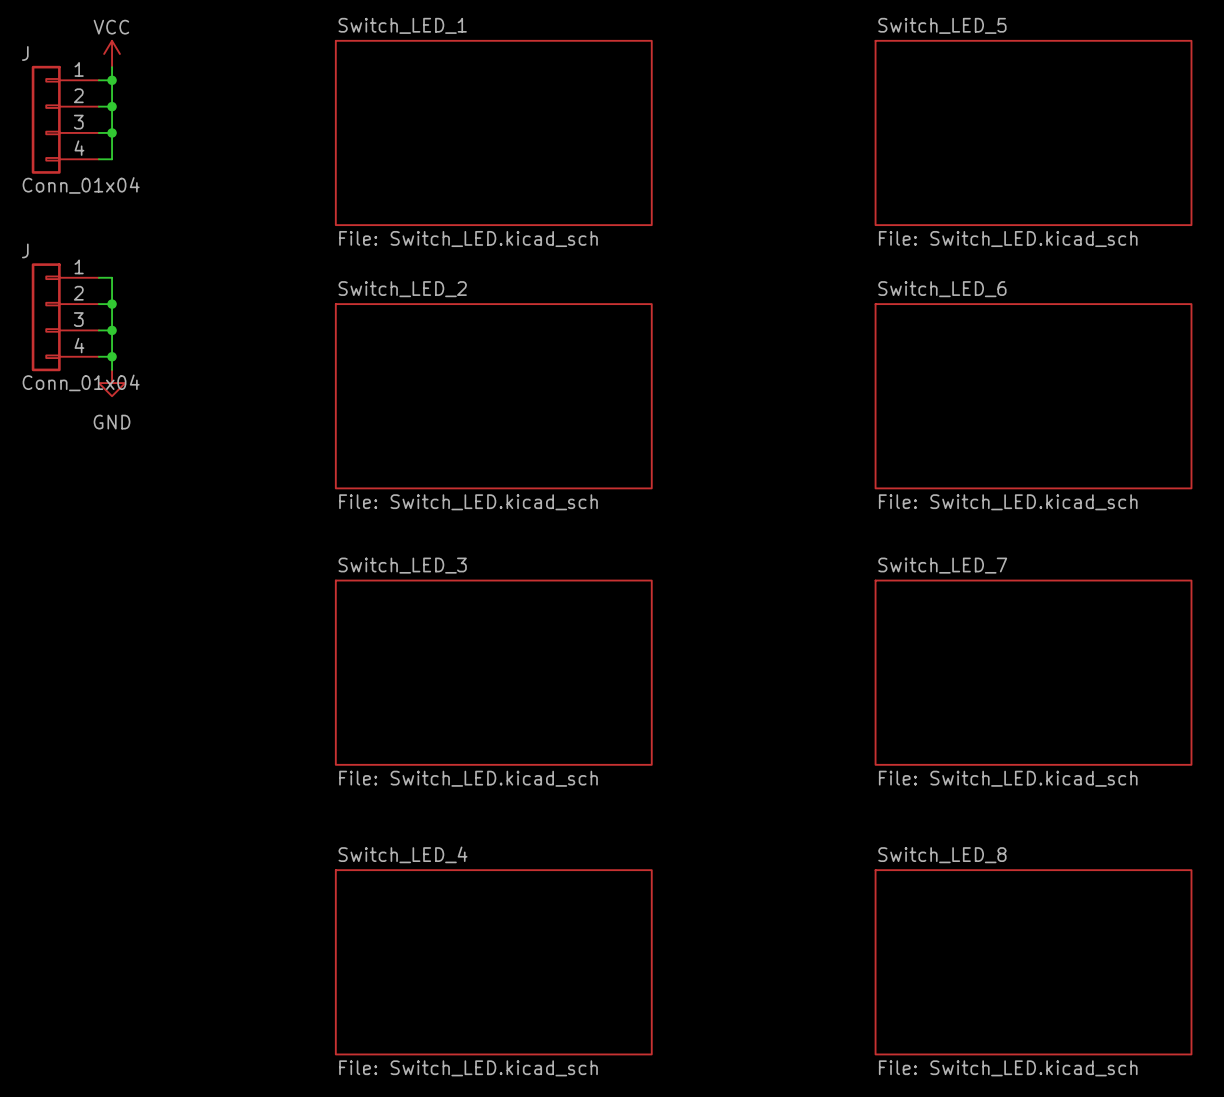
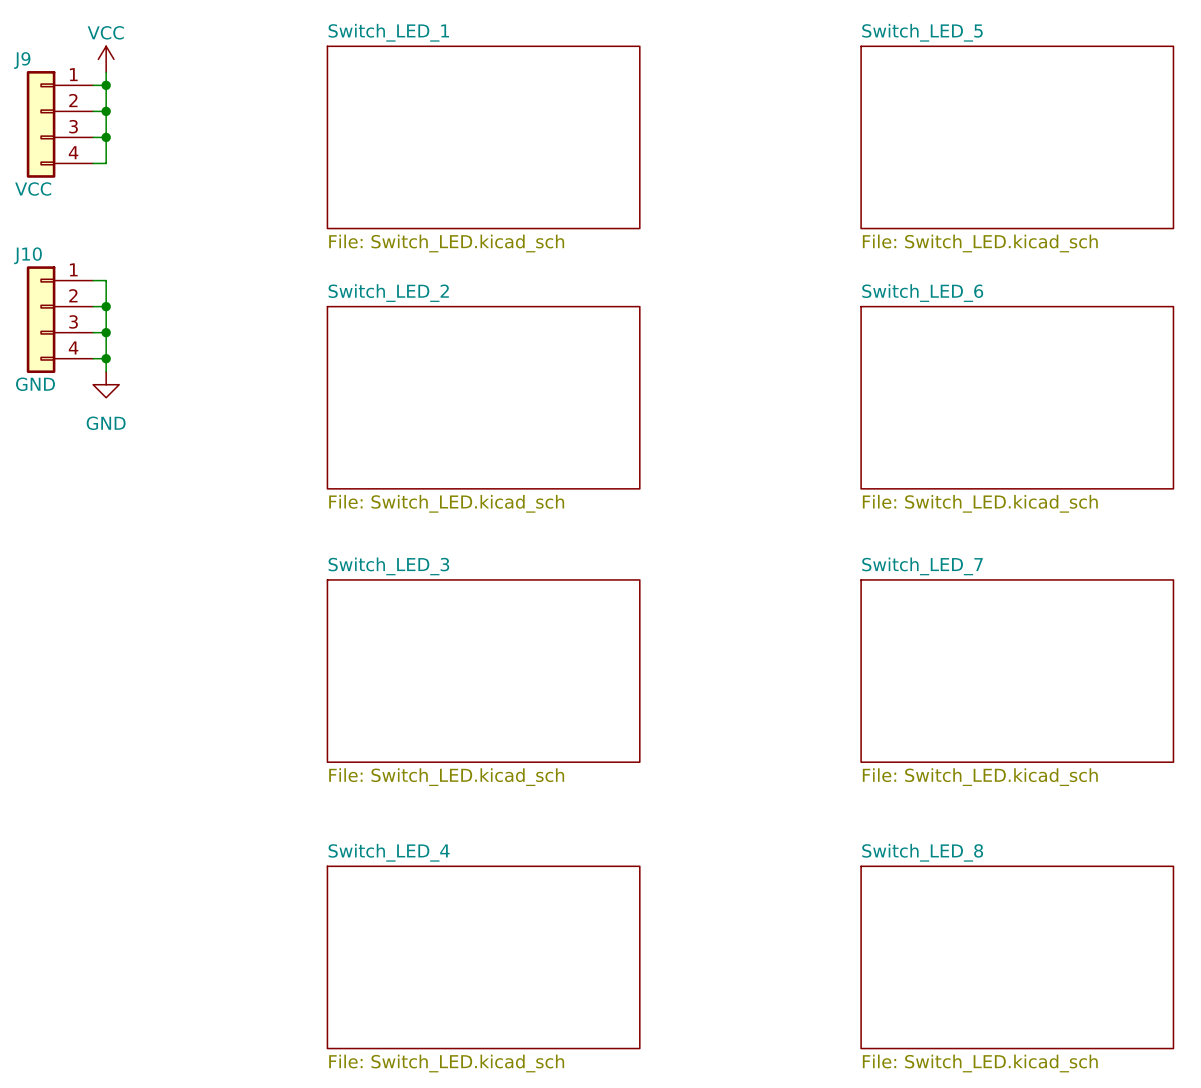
J name: J (25, 53) -> J9 (22, 60)
J value: Conn_01x04 (81, 185) -> VCC (33, 189)
J name: J (25, 250) -> J10 (27, 255)
J value: Conn_01x04 (81, 382) -> GND (35, 384)

